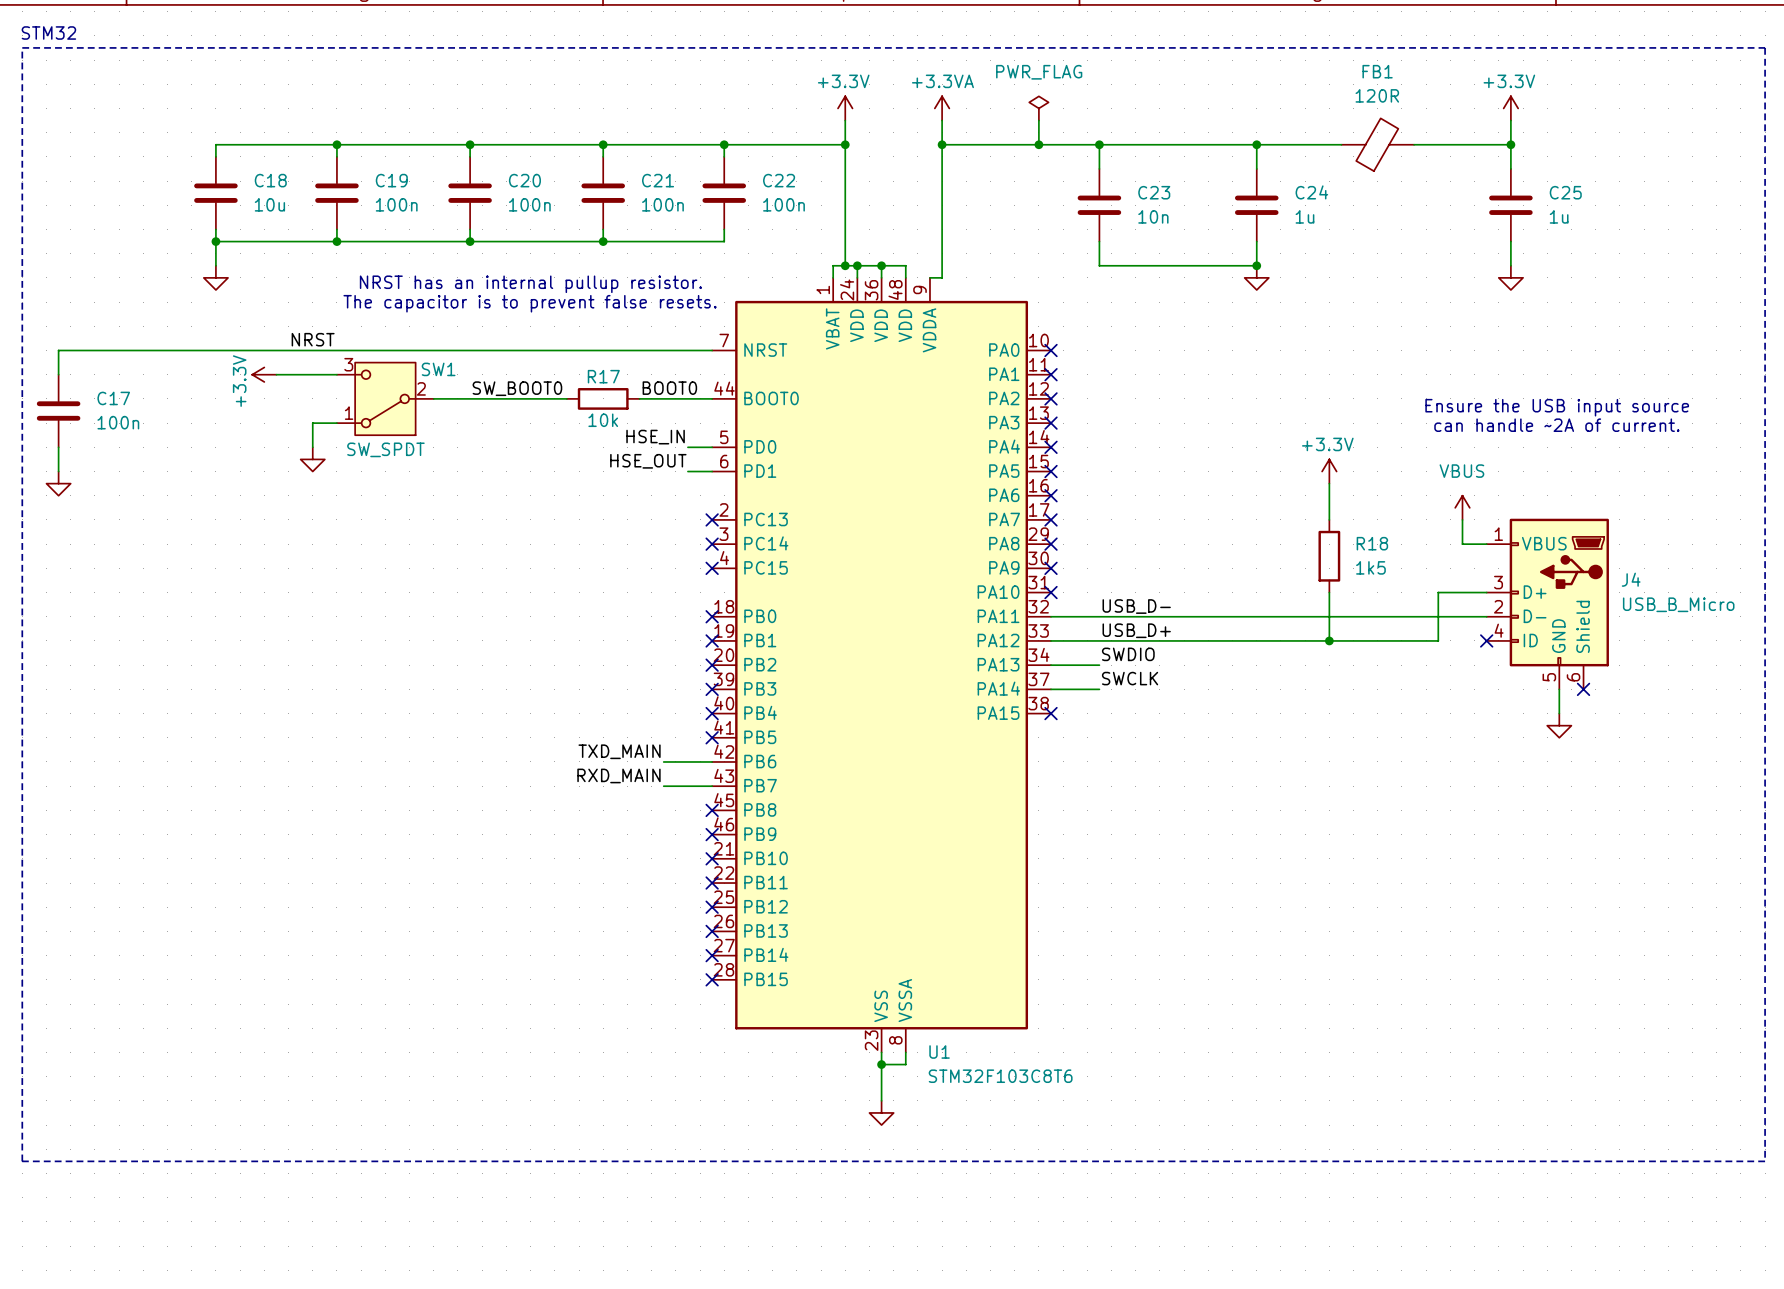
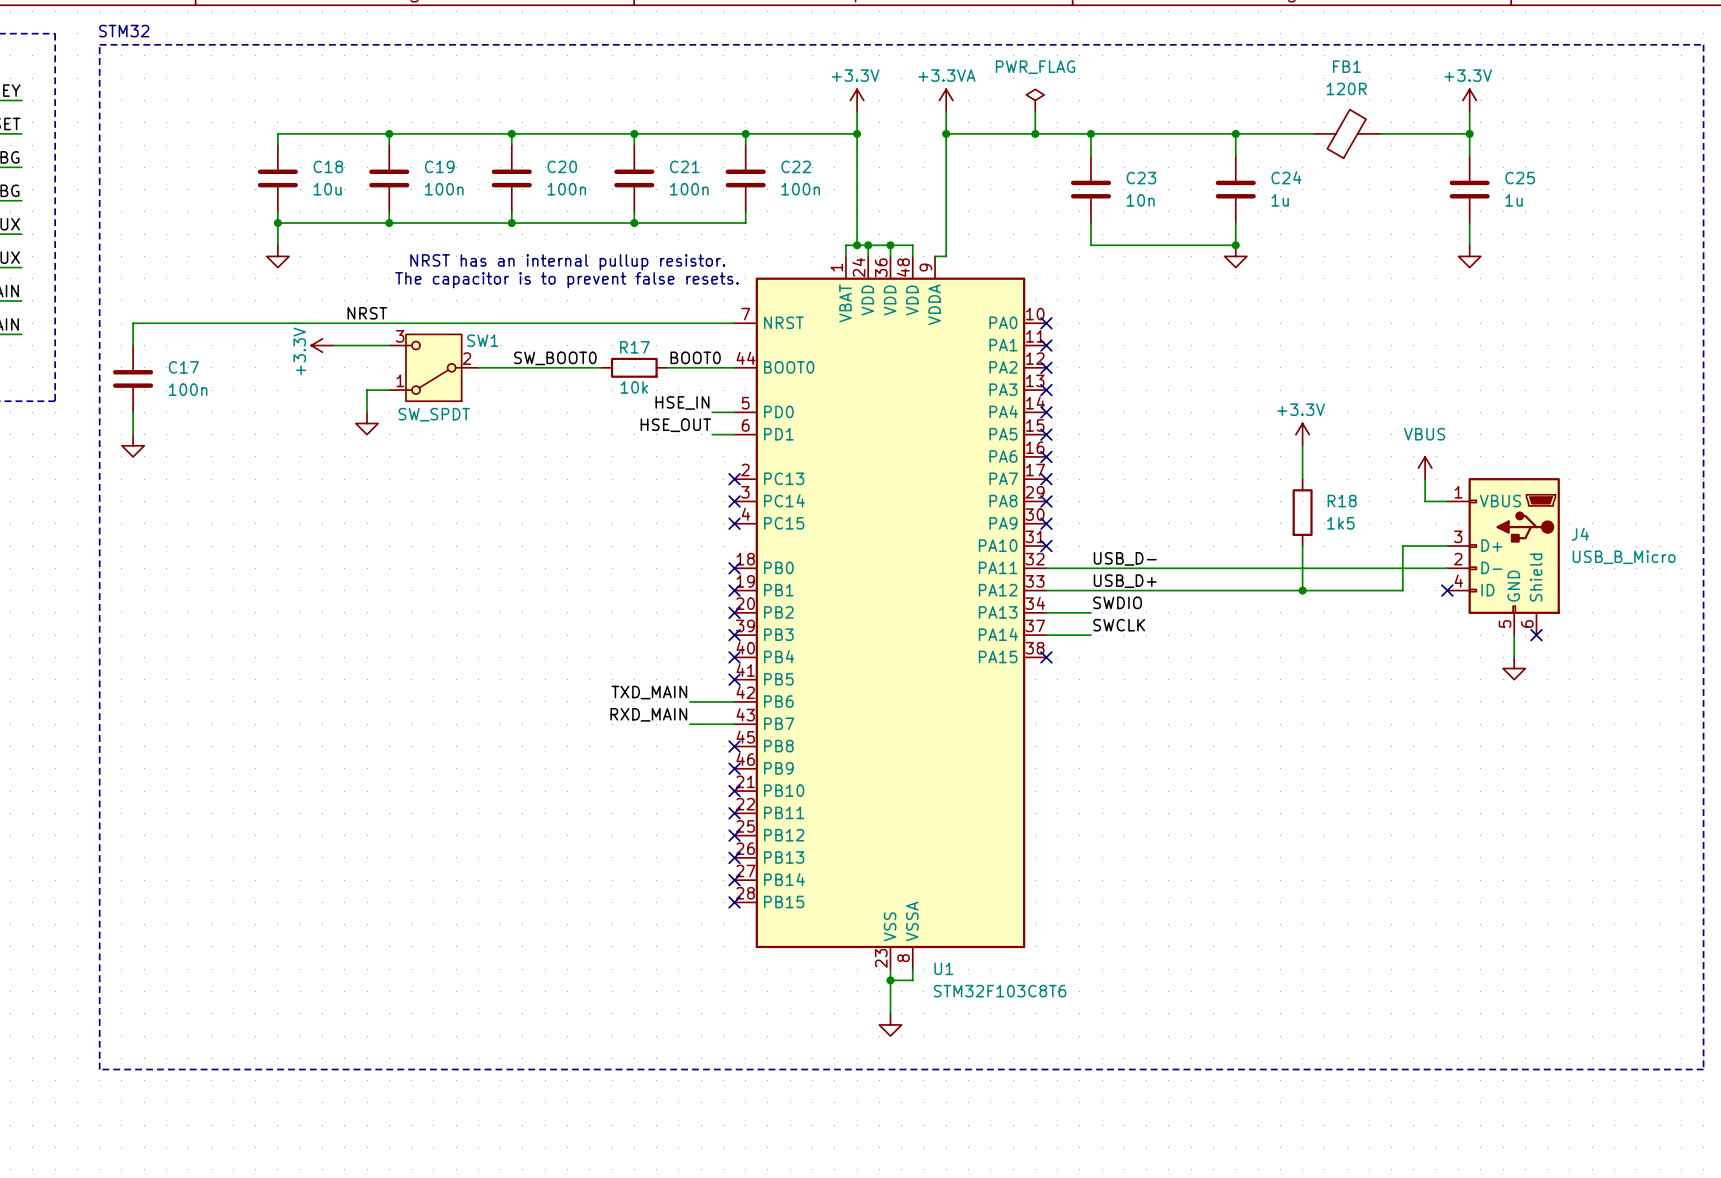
text: Ensure the USB input source (1557, 407) -> none
text: can handle ~2A of current. (1556, 425) -> none

